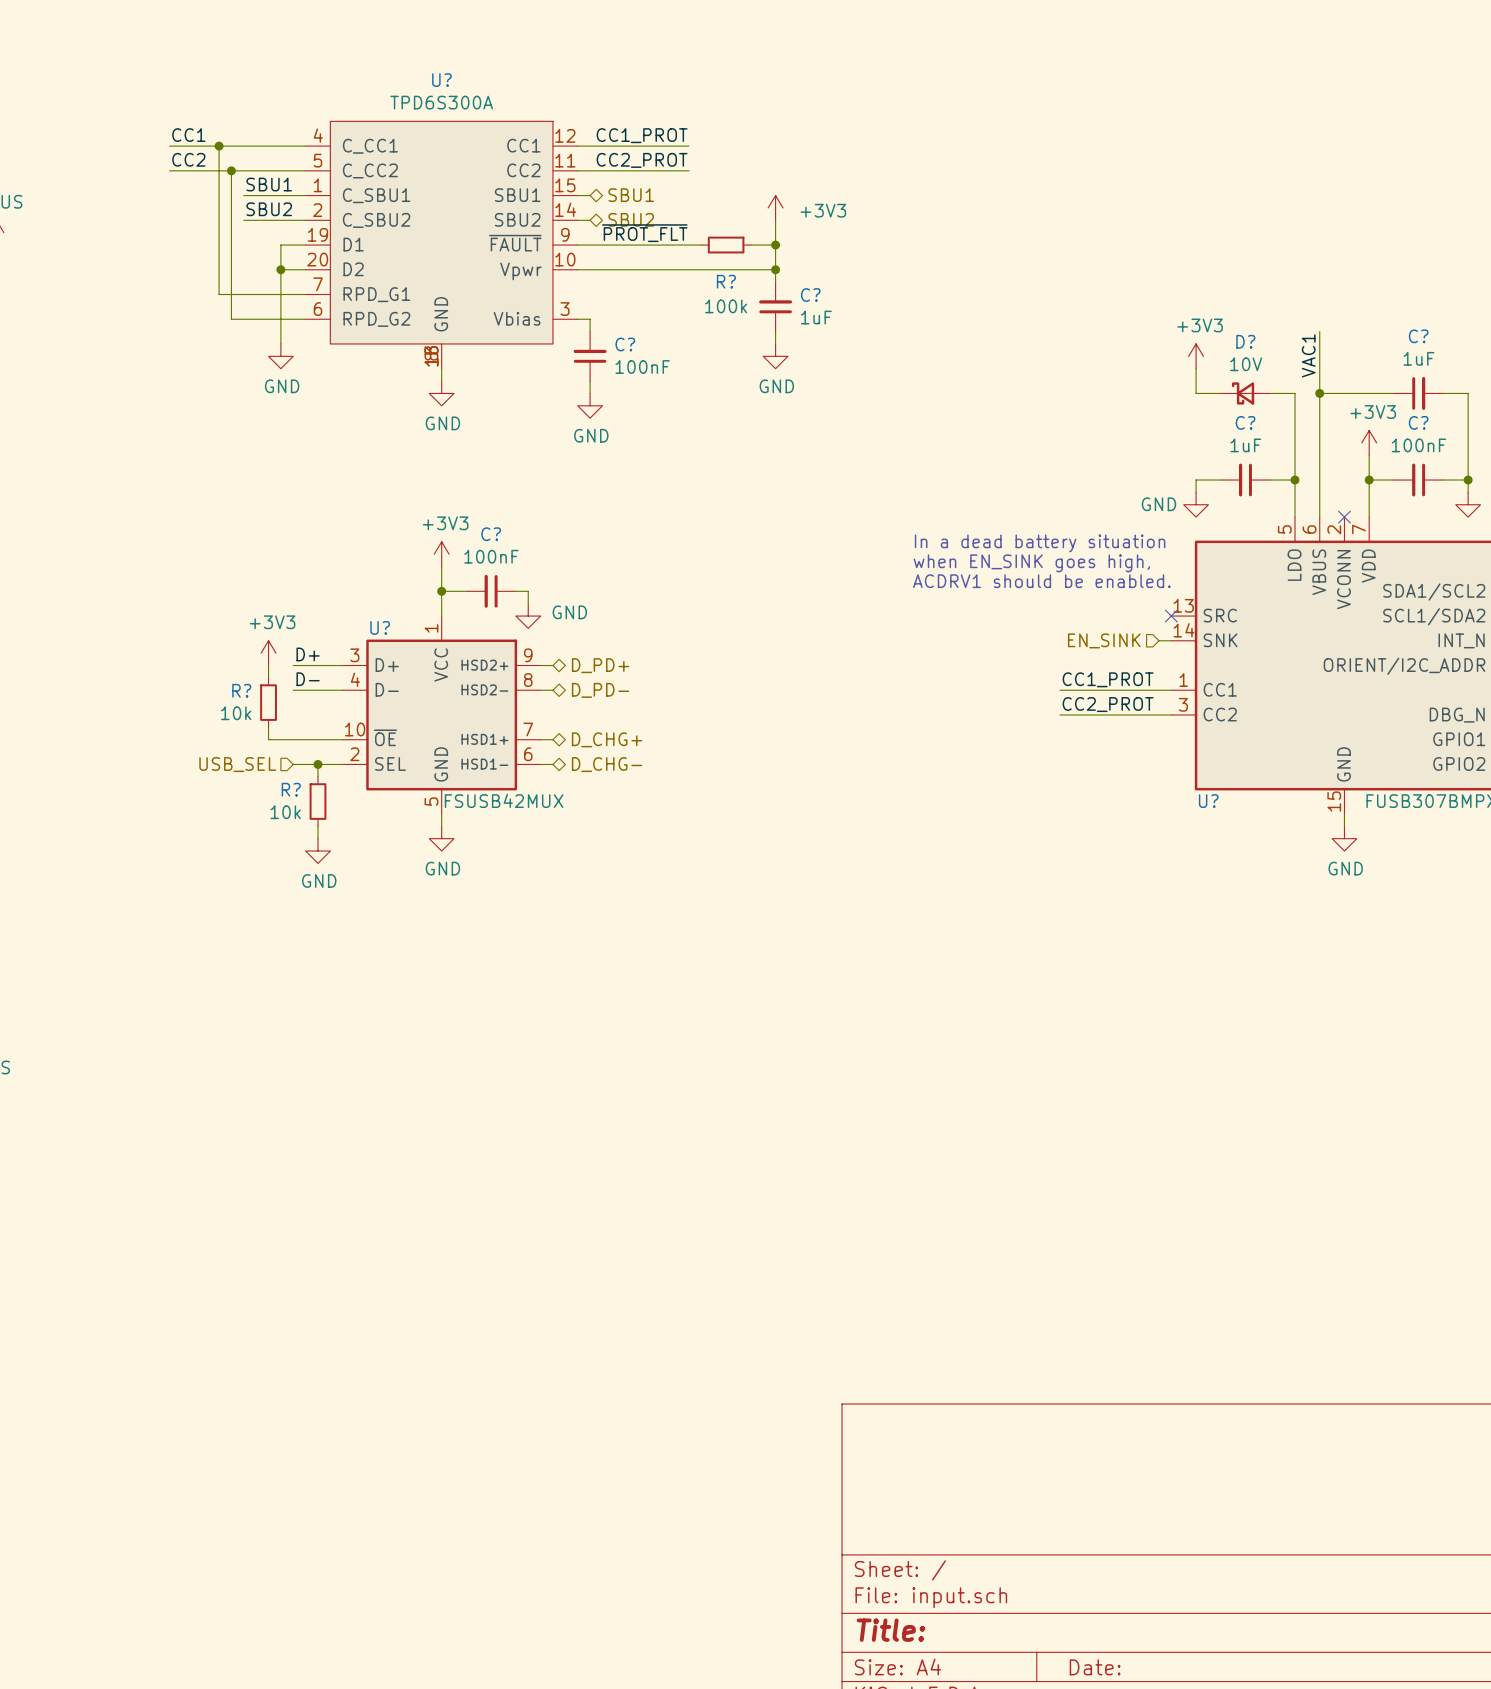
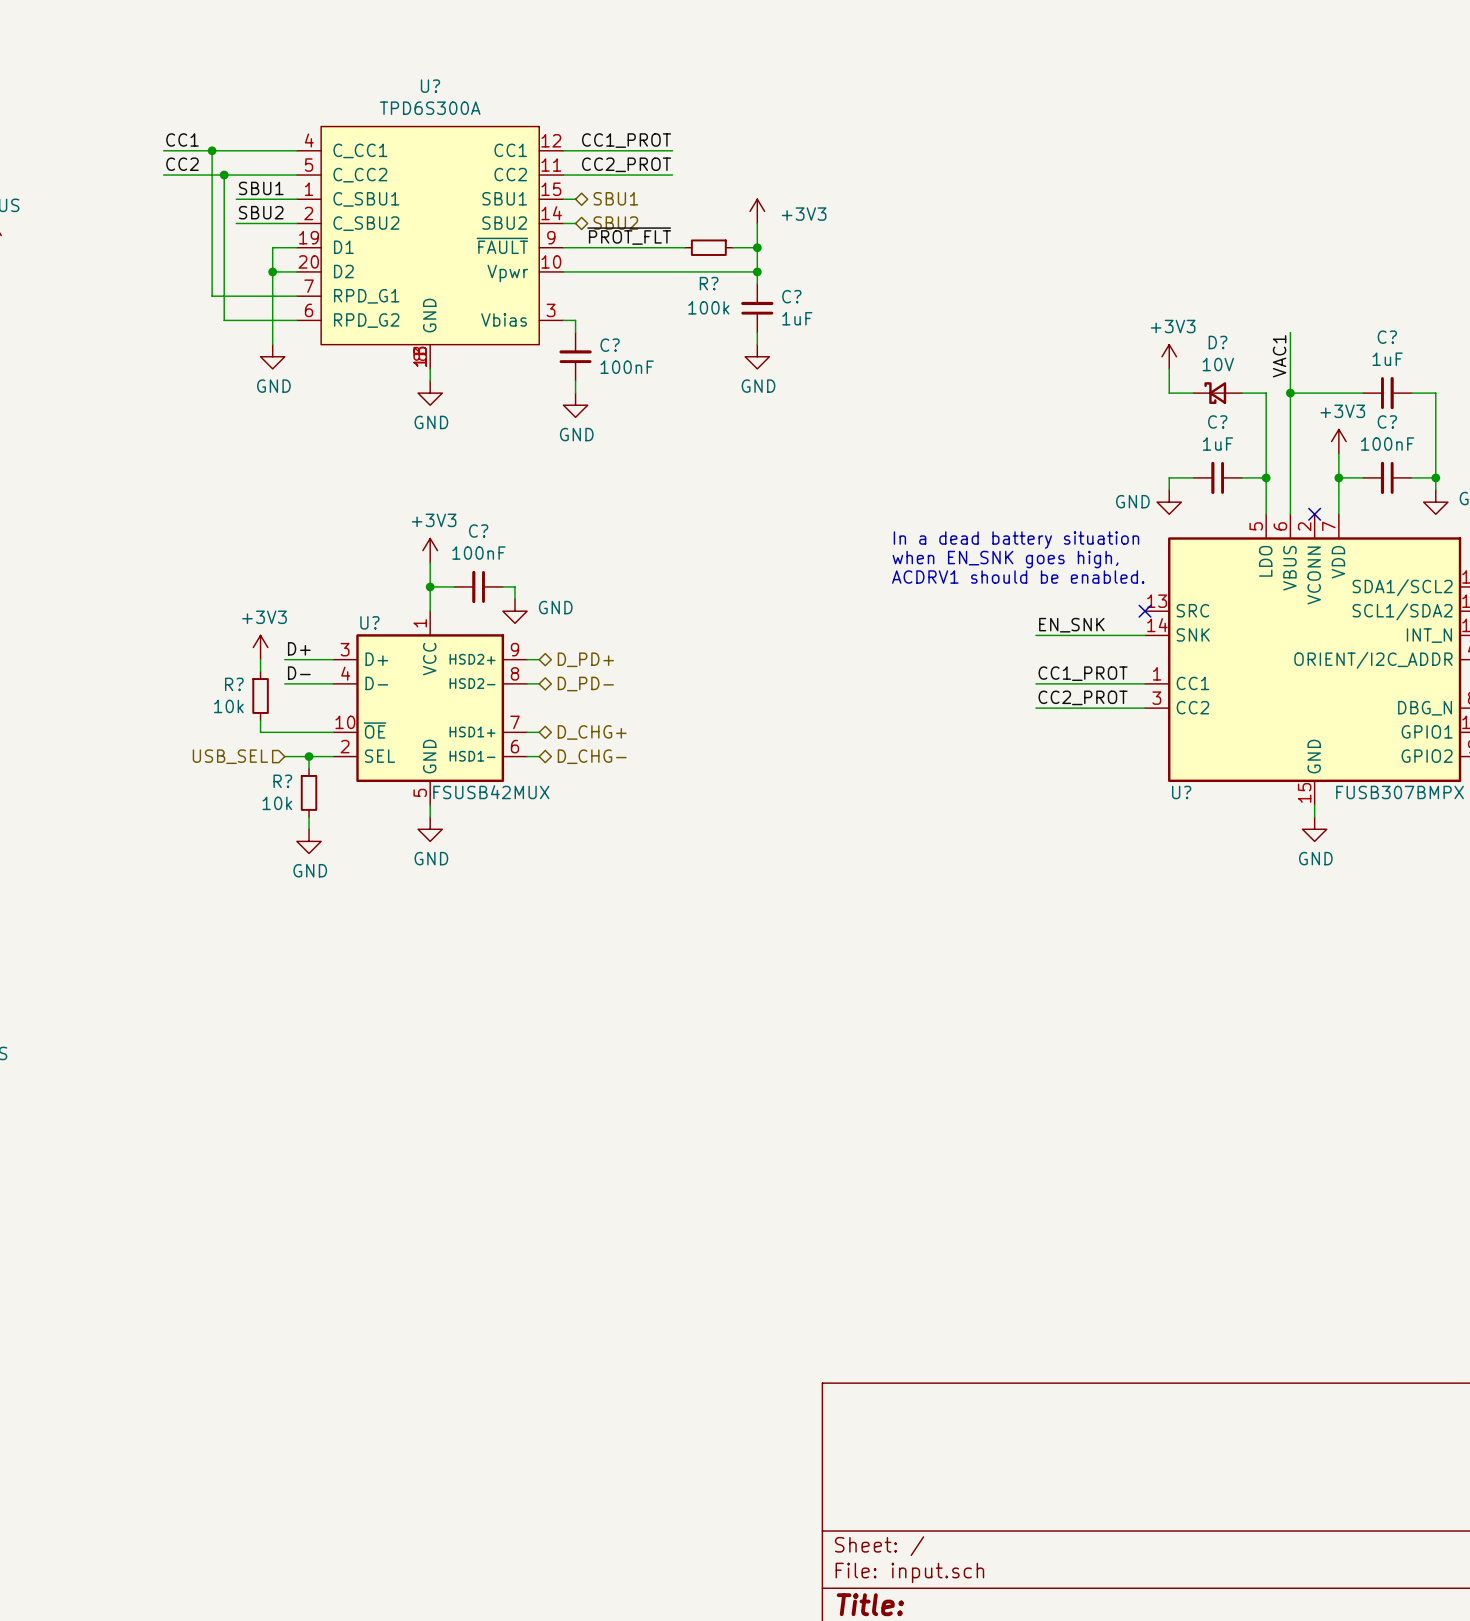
text: when EN_SINK goes high, (1031, 563) -> when EN_SNK goes high, (1005, 559)
label: none -> EN_SNK (1071, 625)
wire: none -> (1035, 635) (1132, 635)
hierarchical label: EN_SINK (1104, 640) -> none

